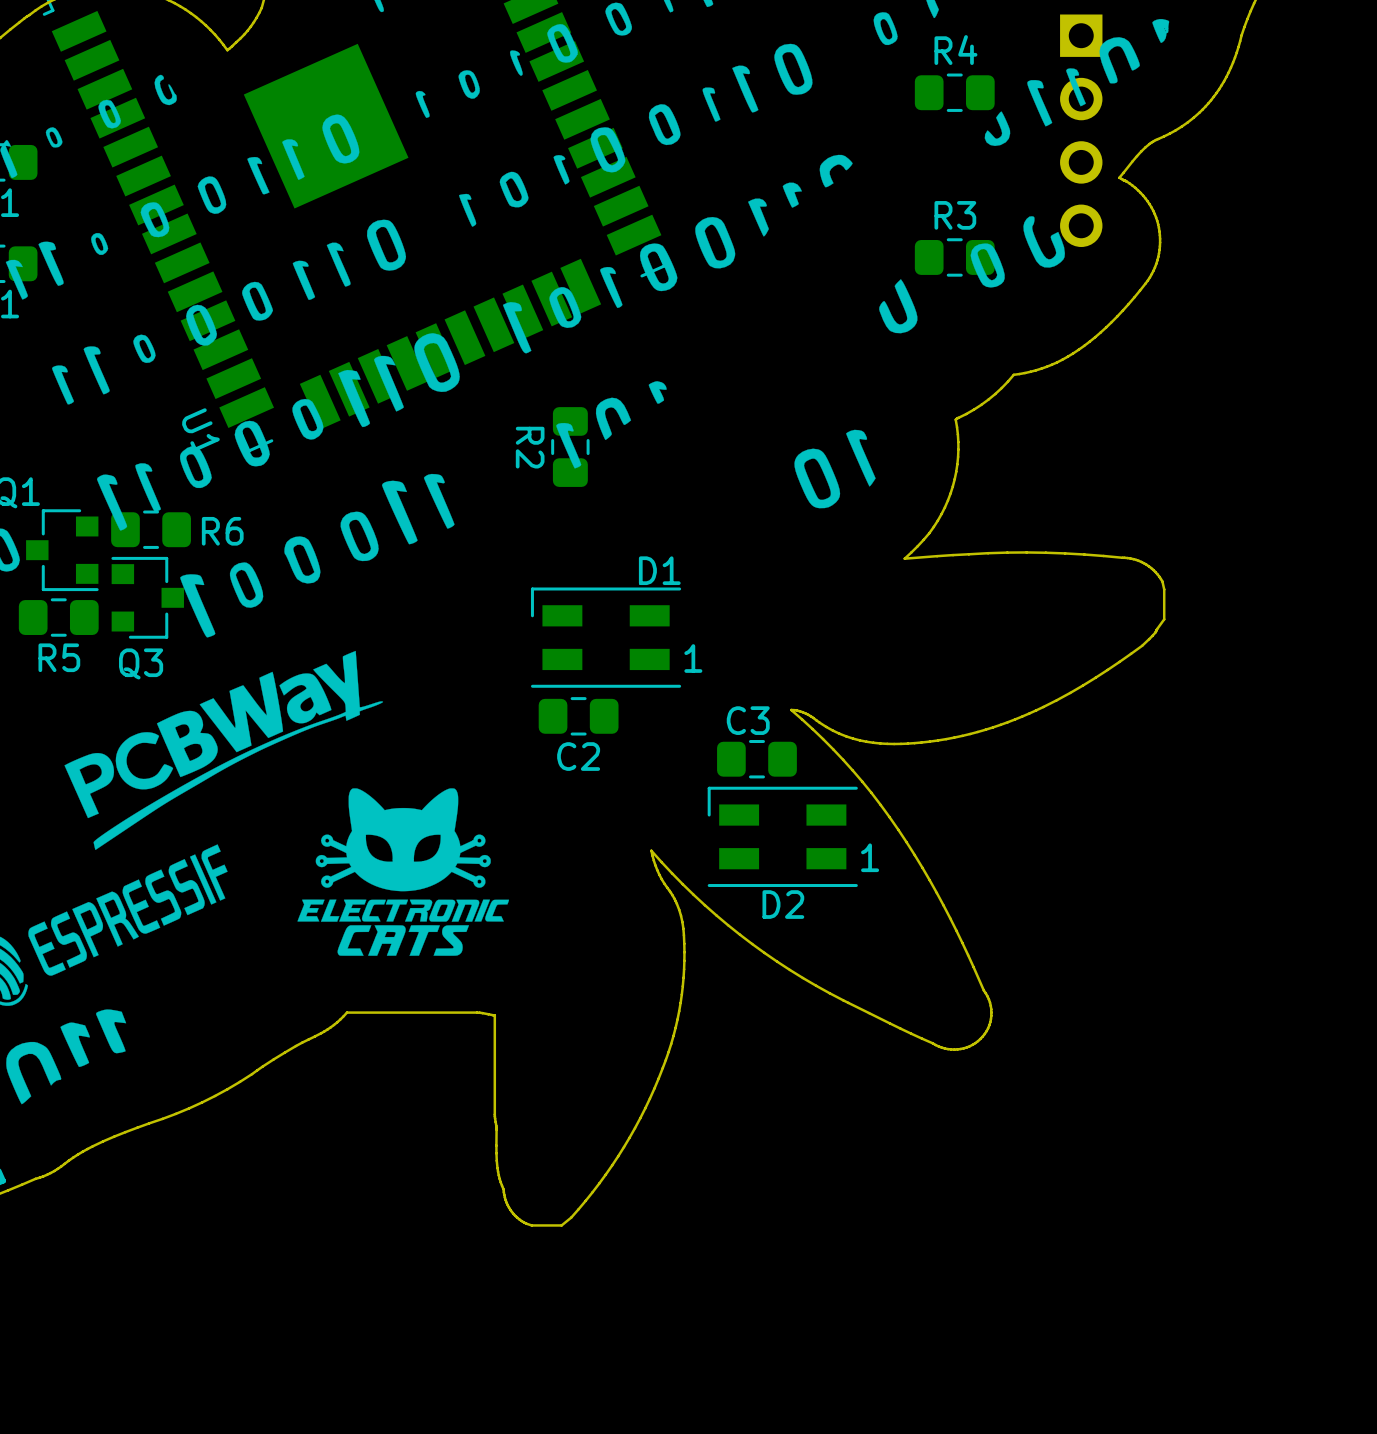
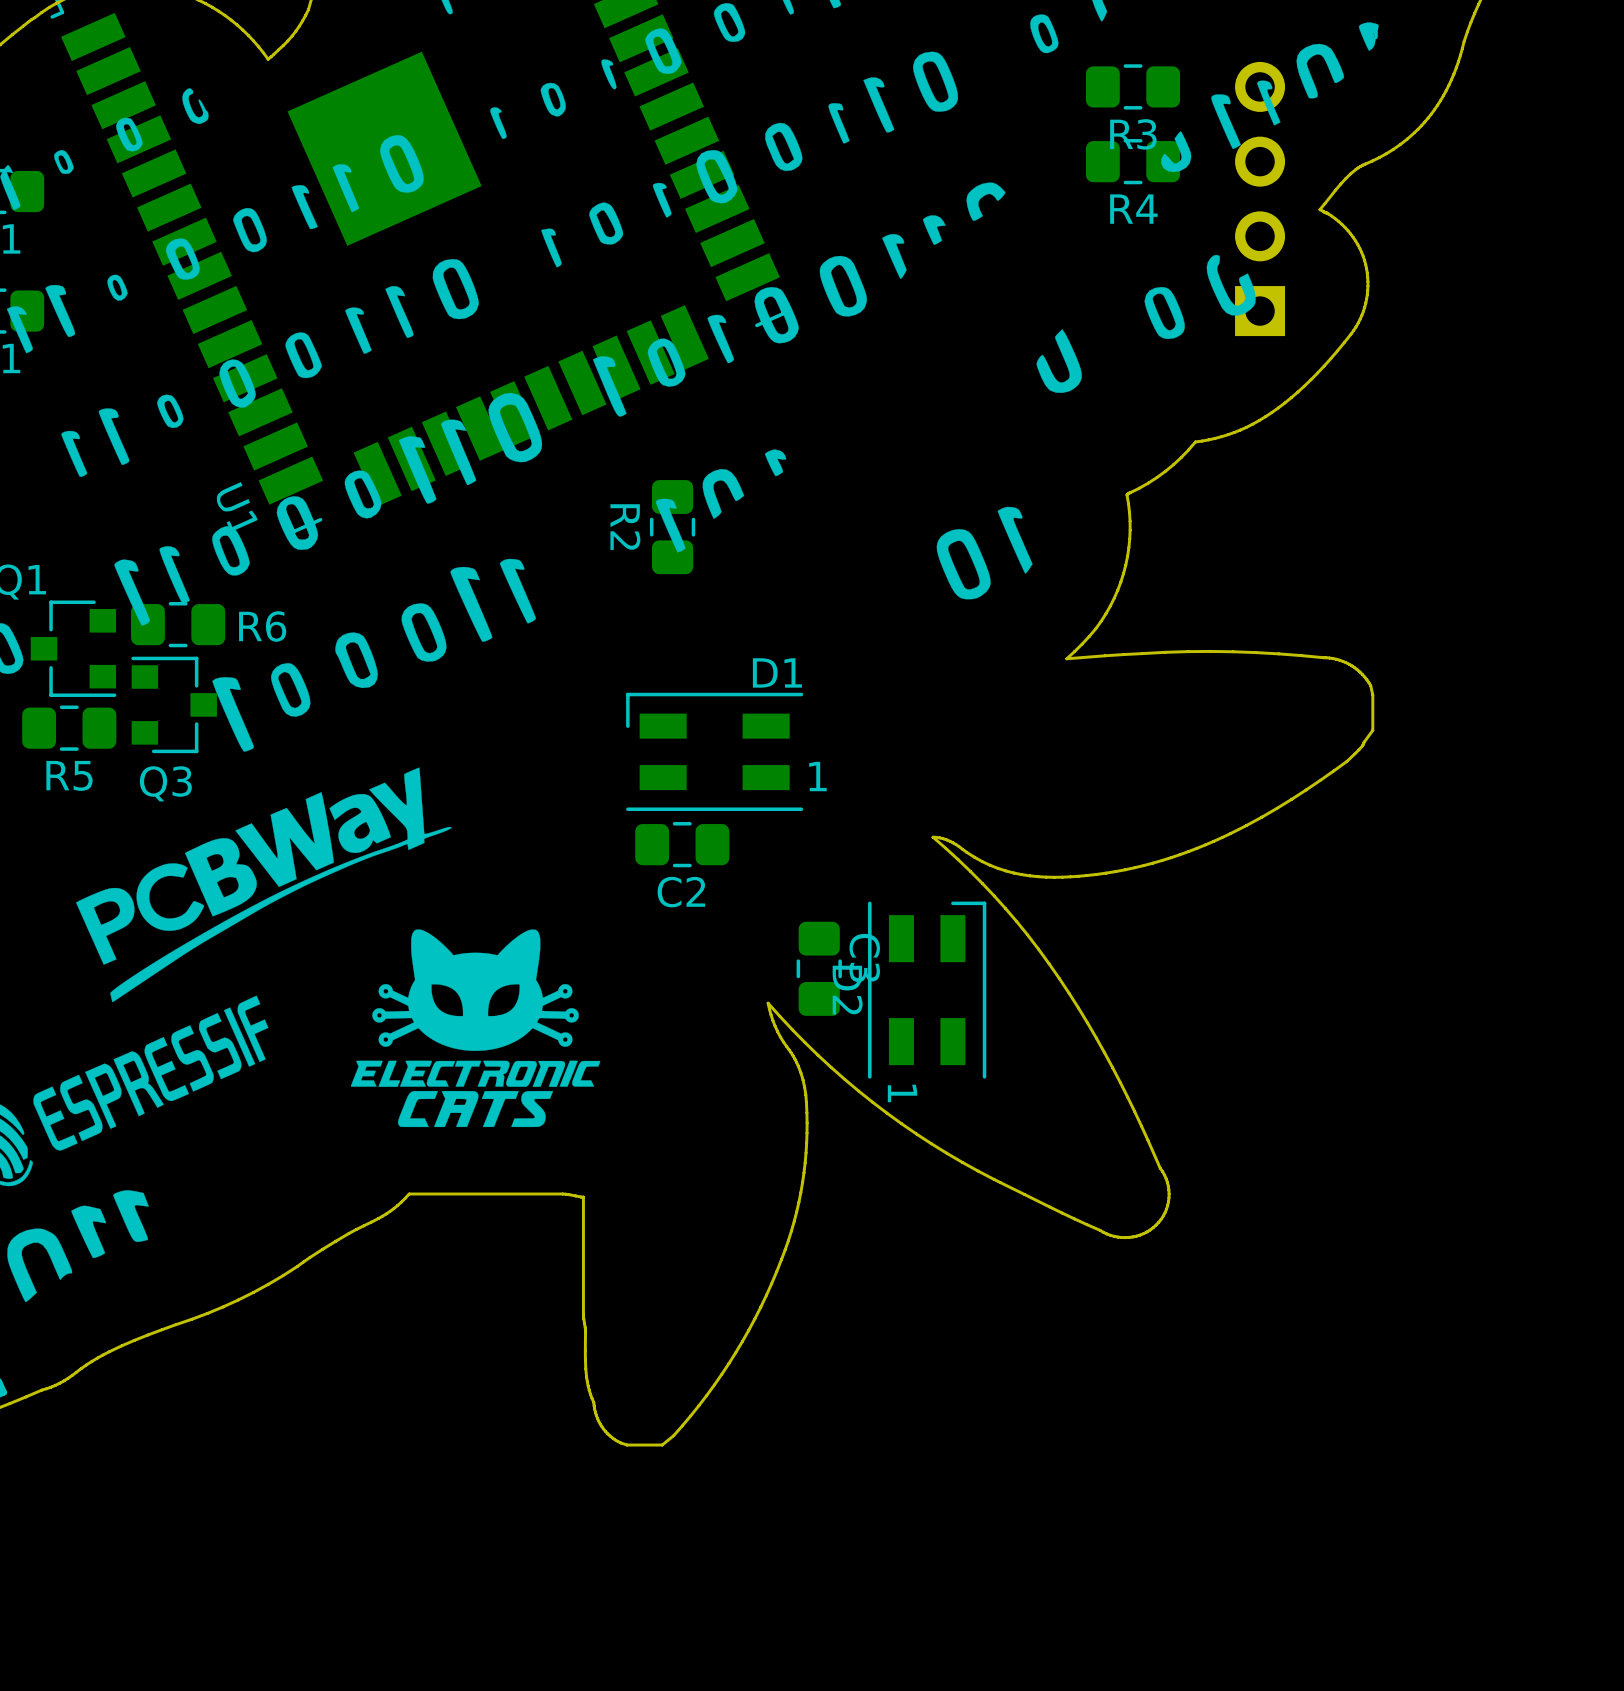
R4 name position: R4 (955, 50) -> R4 (1133, 209)
R4 position: (954, 92) -> (1133, 161)
part rotation: 0° (1081, 130) -> 180° (1260, 199)
R3 name position: R3 (955, 215) -> R3 (1133, 134)
R3 position: (954, 257) -> (1133, 86)
C3 rotation: 0° (756, 759) -> 90° clockwise (819, 968)
C3 position: (756, 759) -> (819, 968)
D2 rotation: 0° (782, 836) -> 90° clockwise (927, 990)

